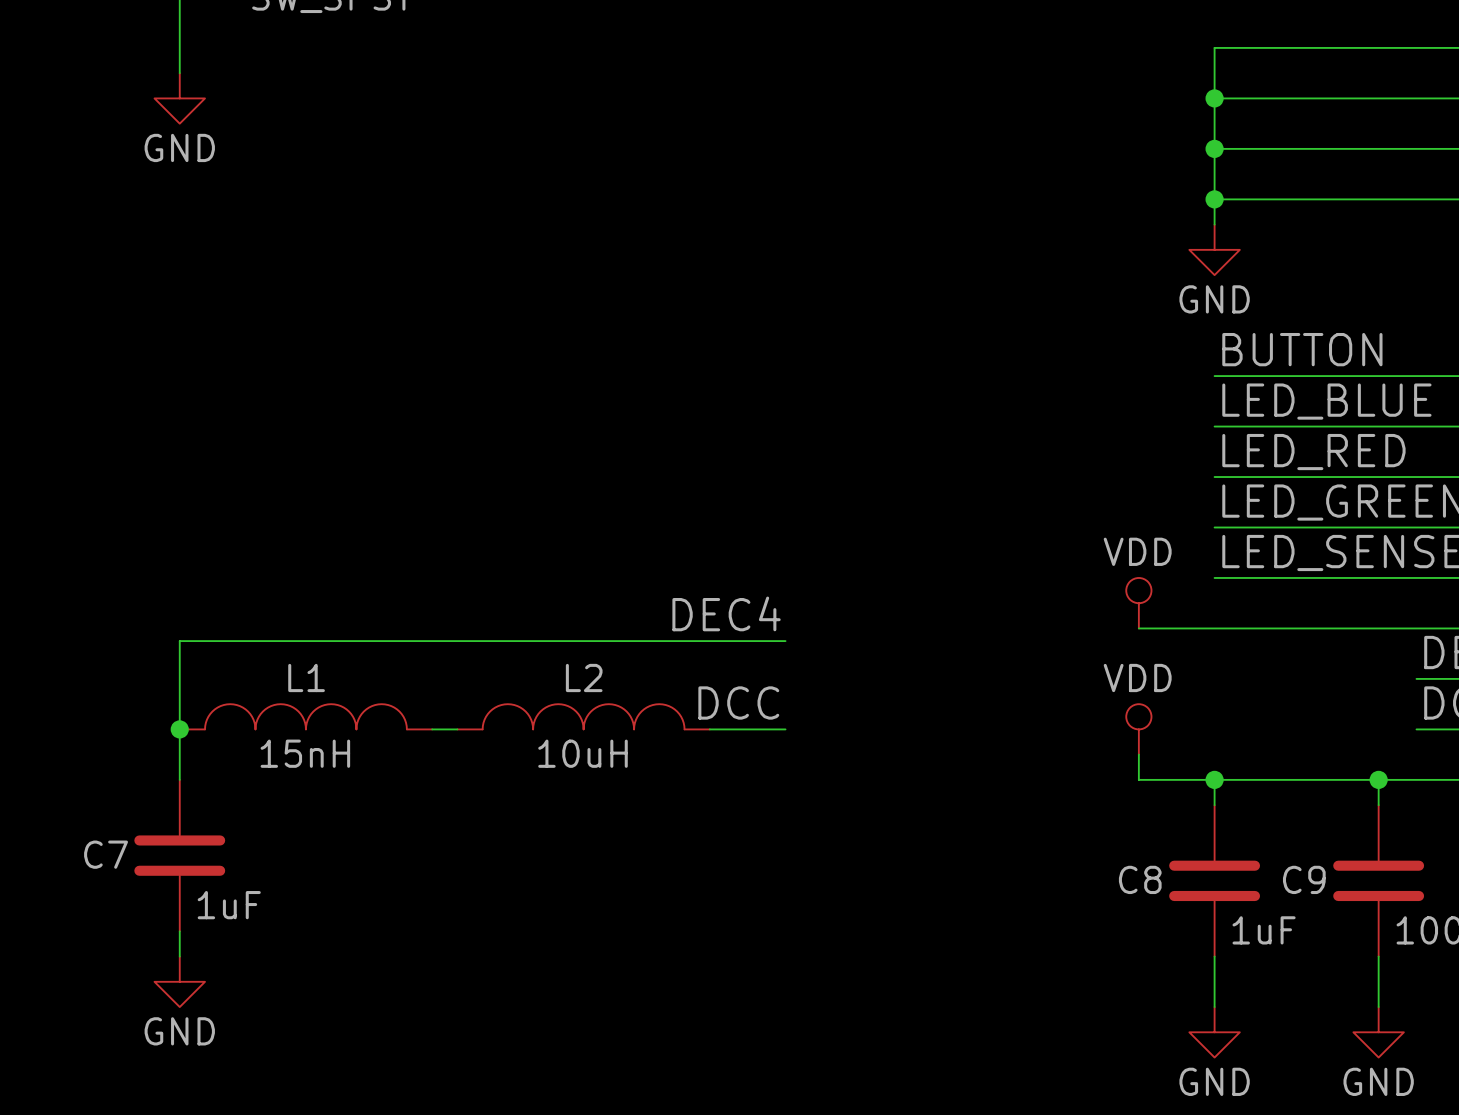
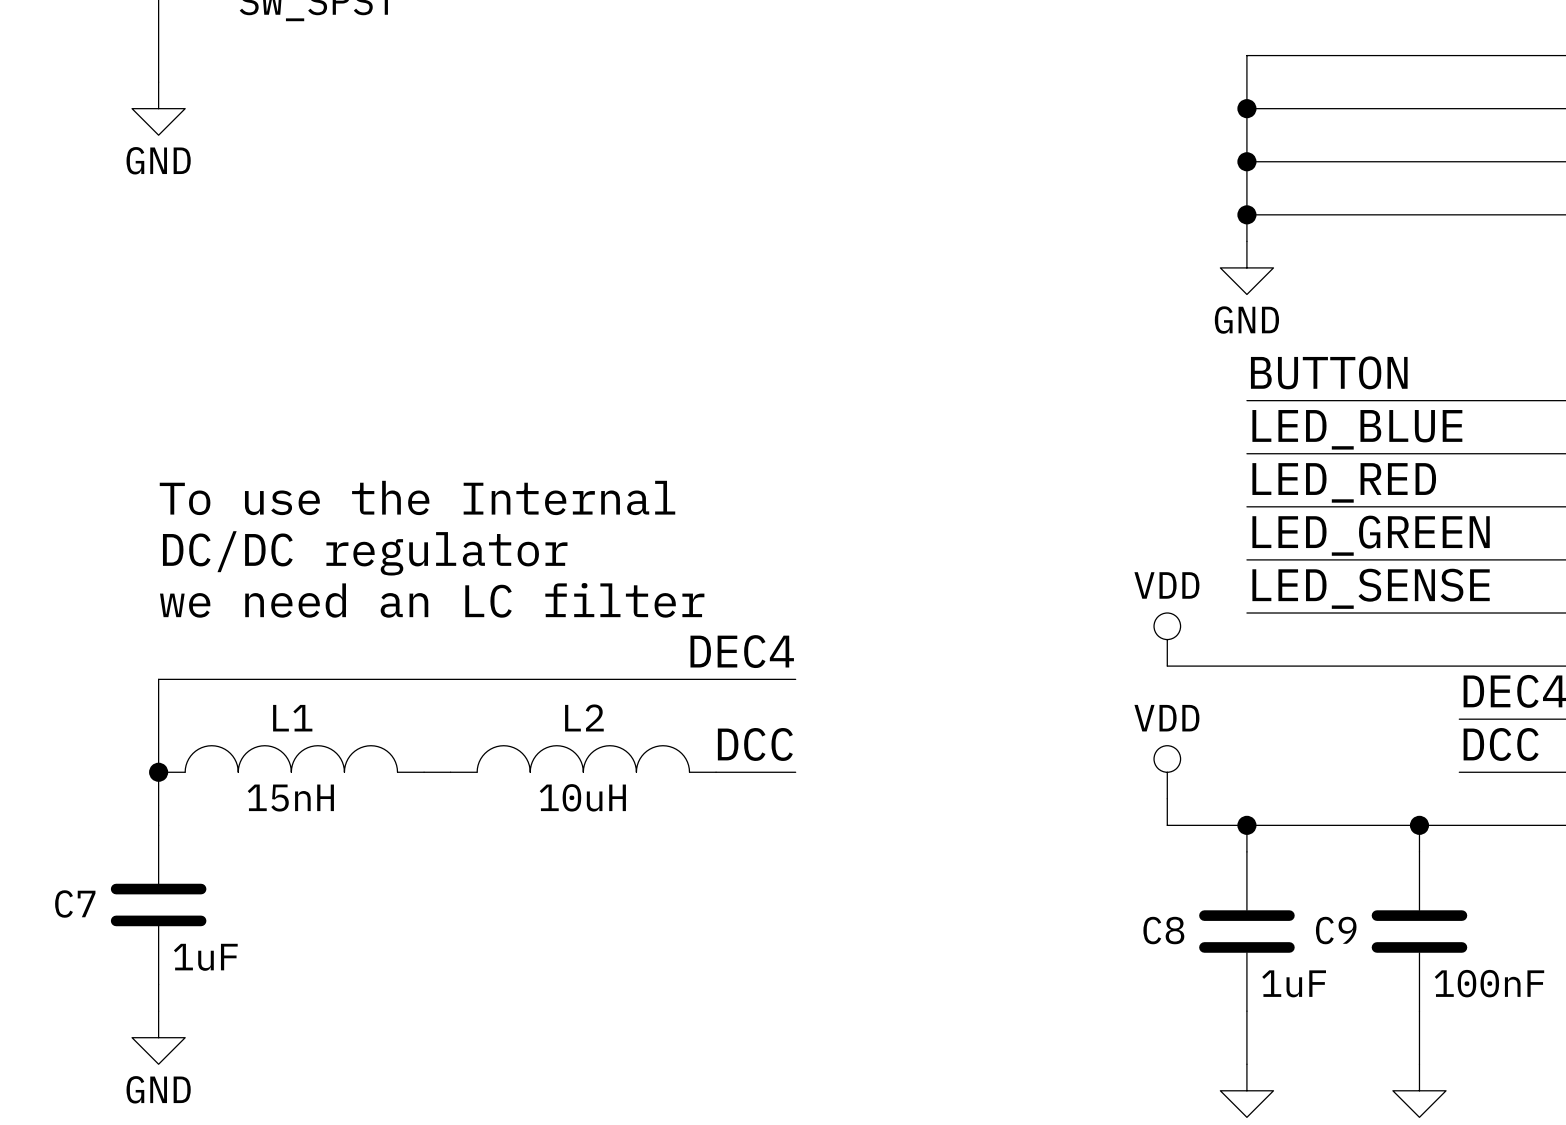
text: none -> To use the Internal (417, 497)
text: none -> DC/DC regulator (365, 553)
text: none -> we need an LC filter (432, 600)

